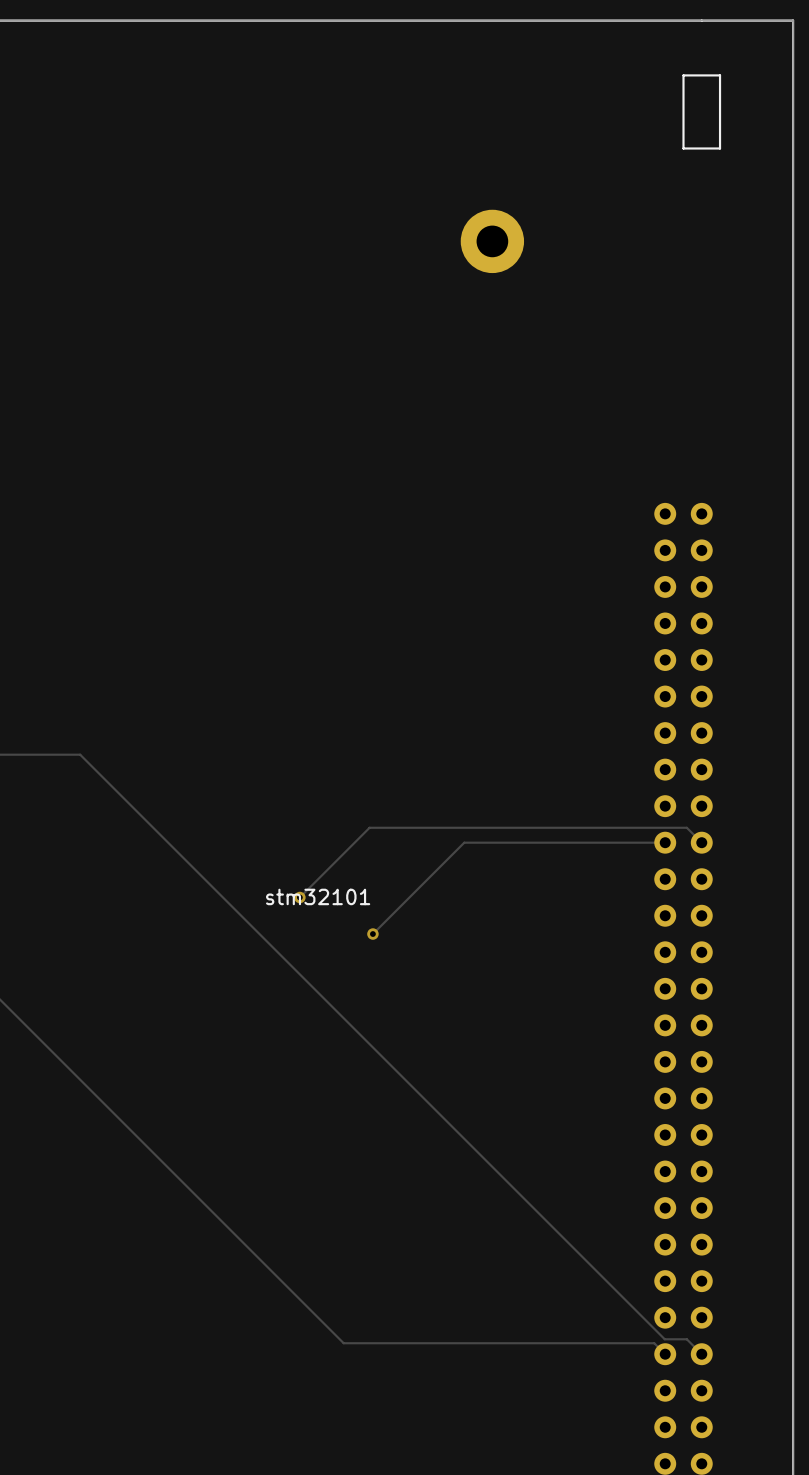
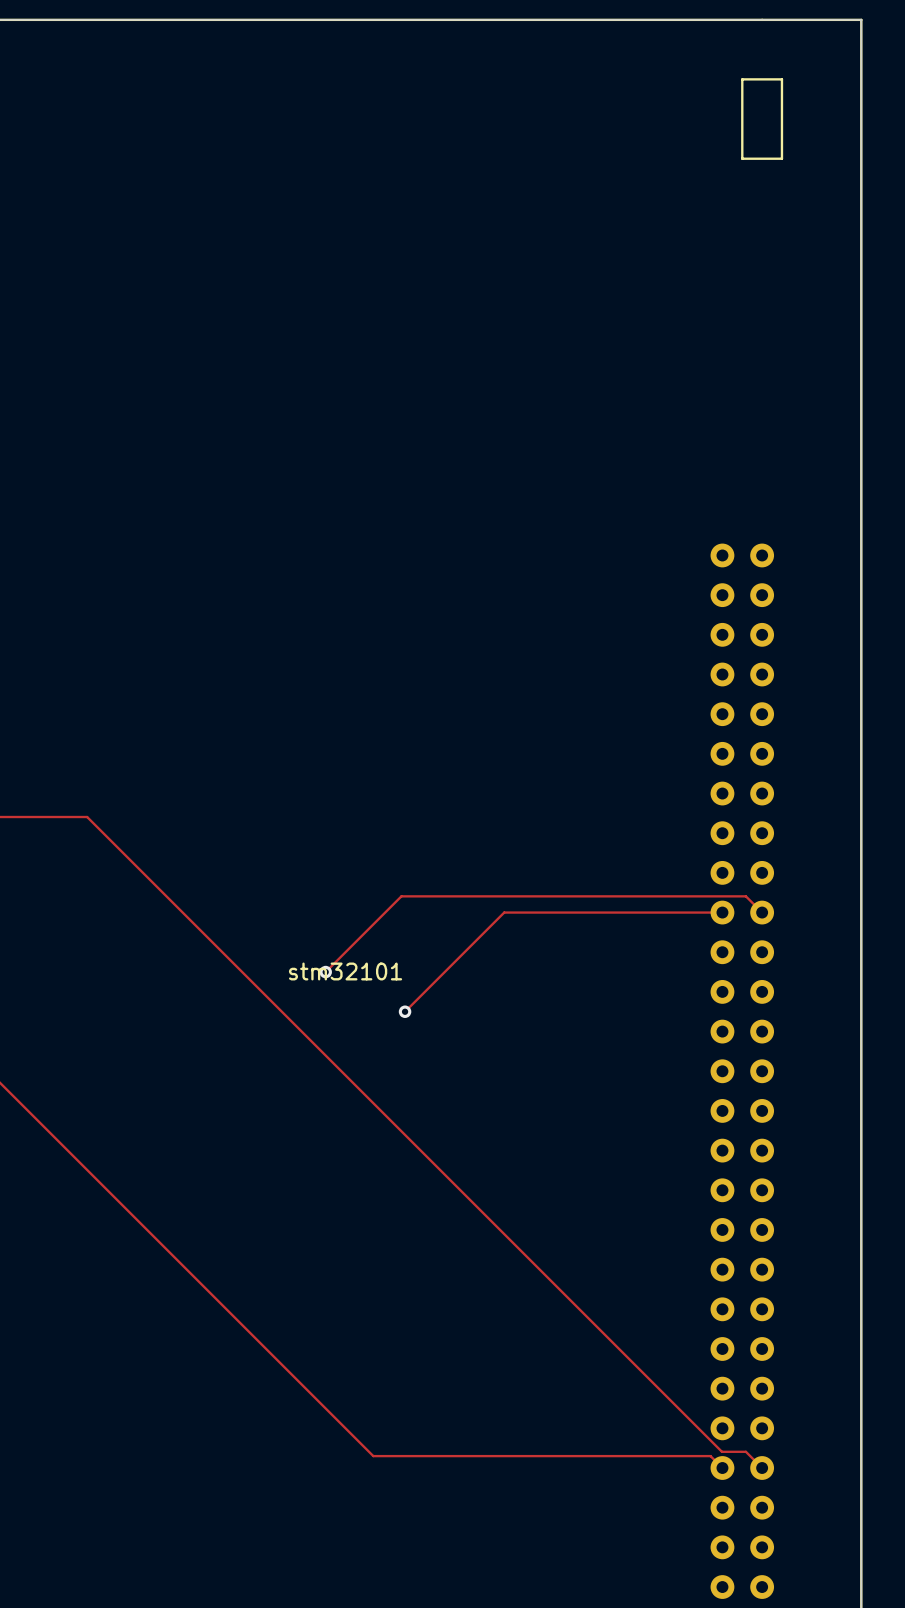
part: (492, 241) -> none

